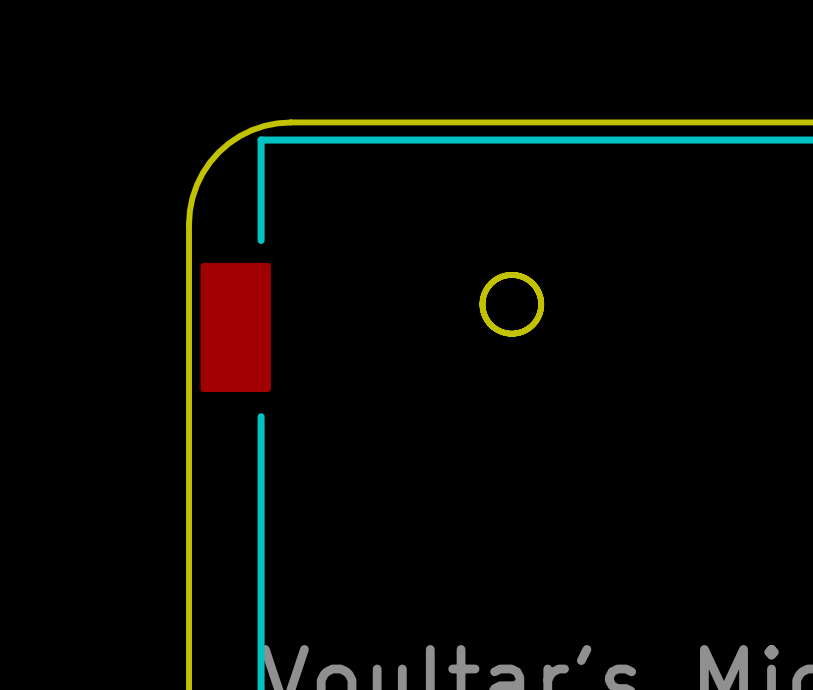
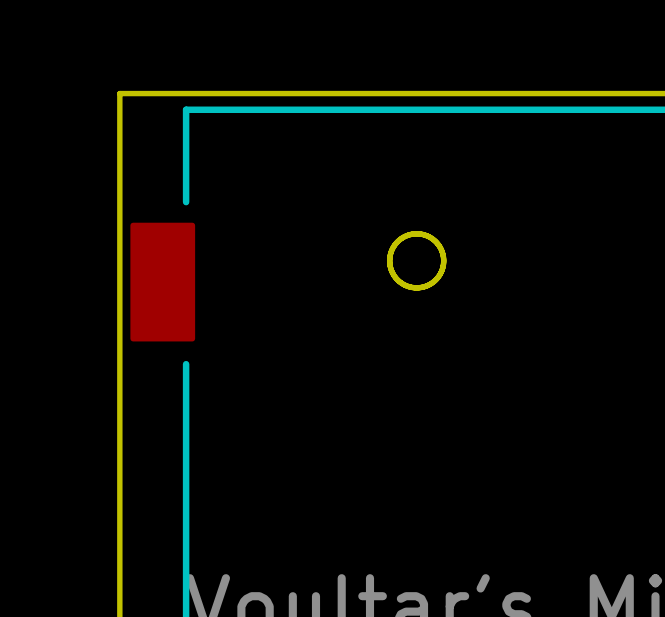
board edge: (290, 122) (264, 125) (251, 130) (228, 143) (218, 152) (202, 173) (196, 185) (189, 210) (189, 224) -> (213, 93) (119, 93) (119, 187)

